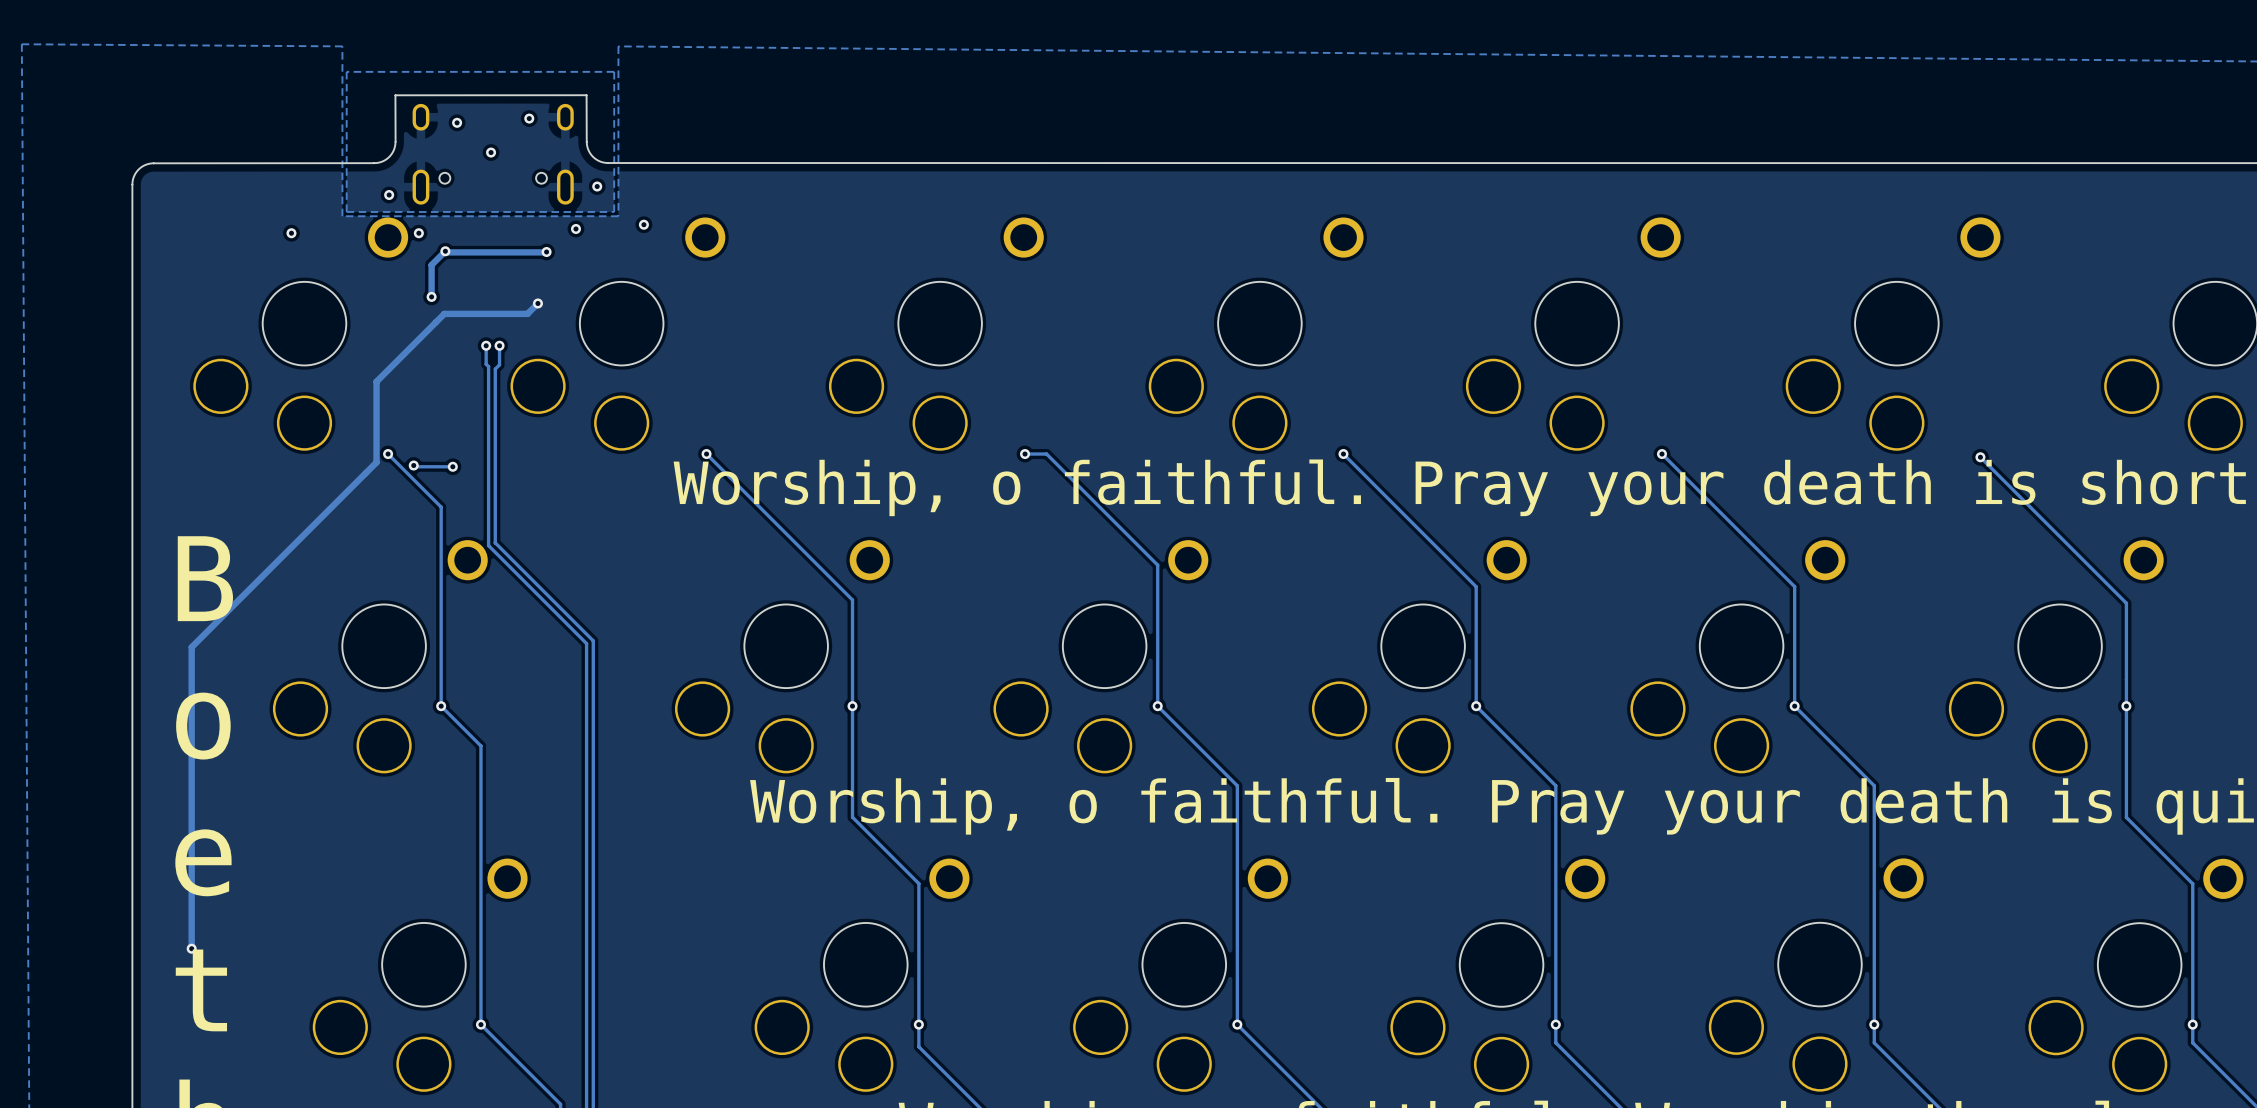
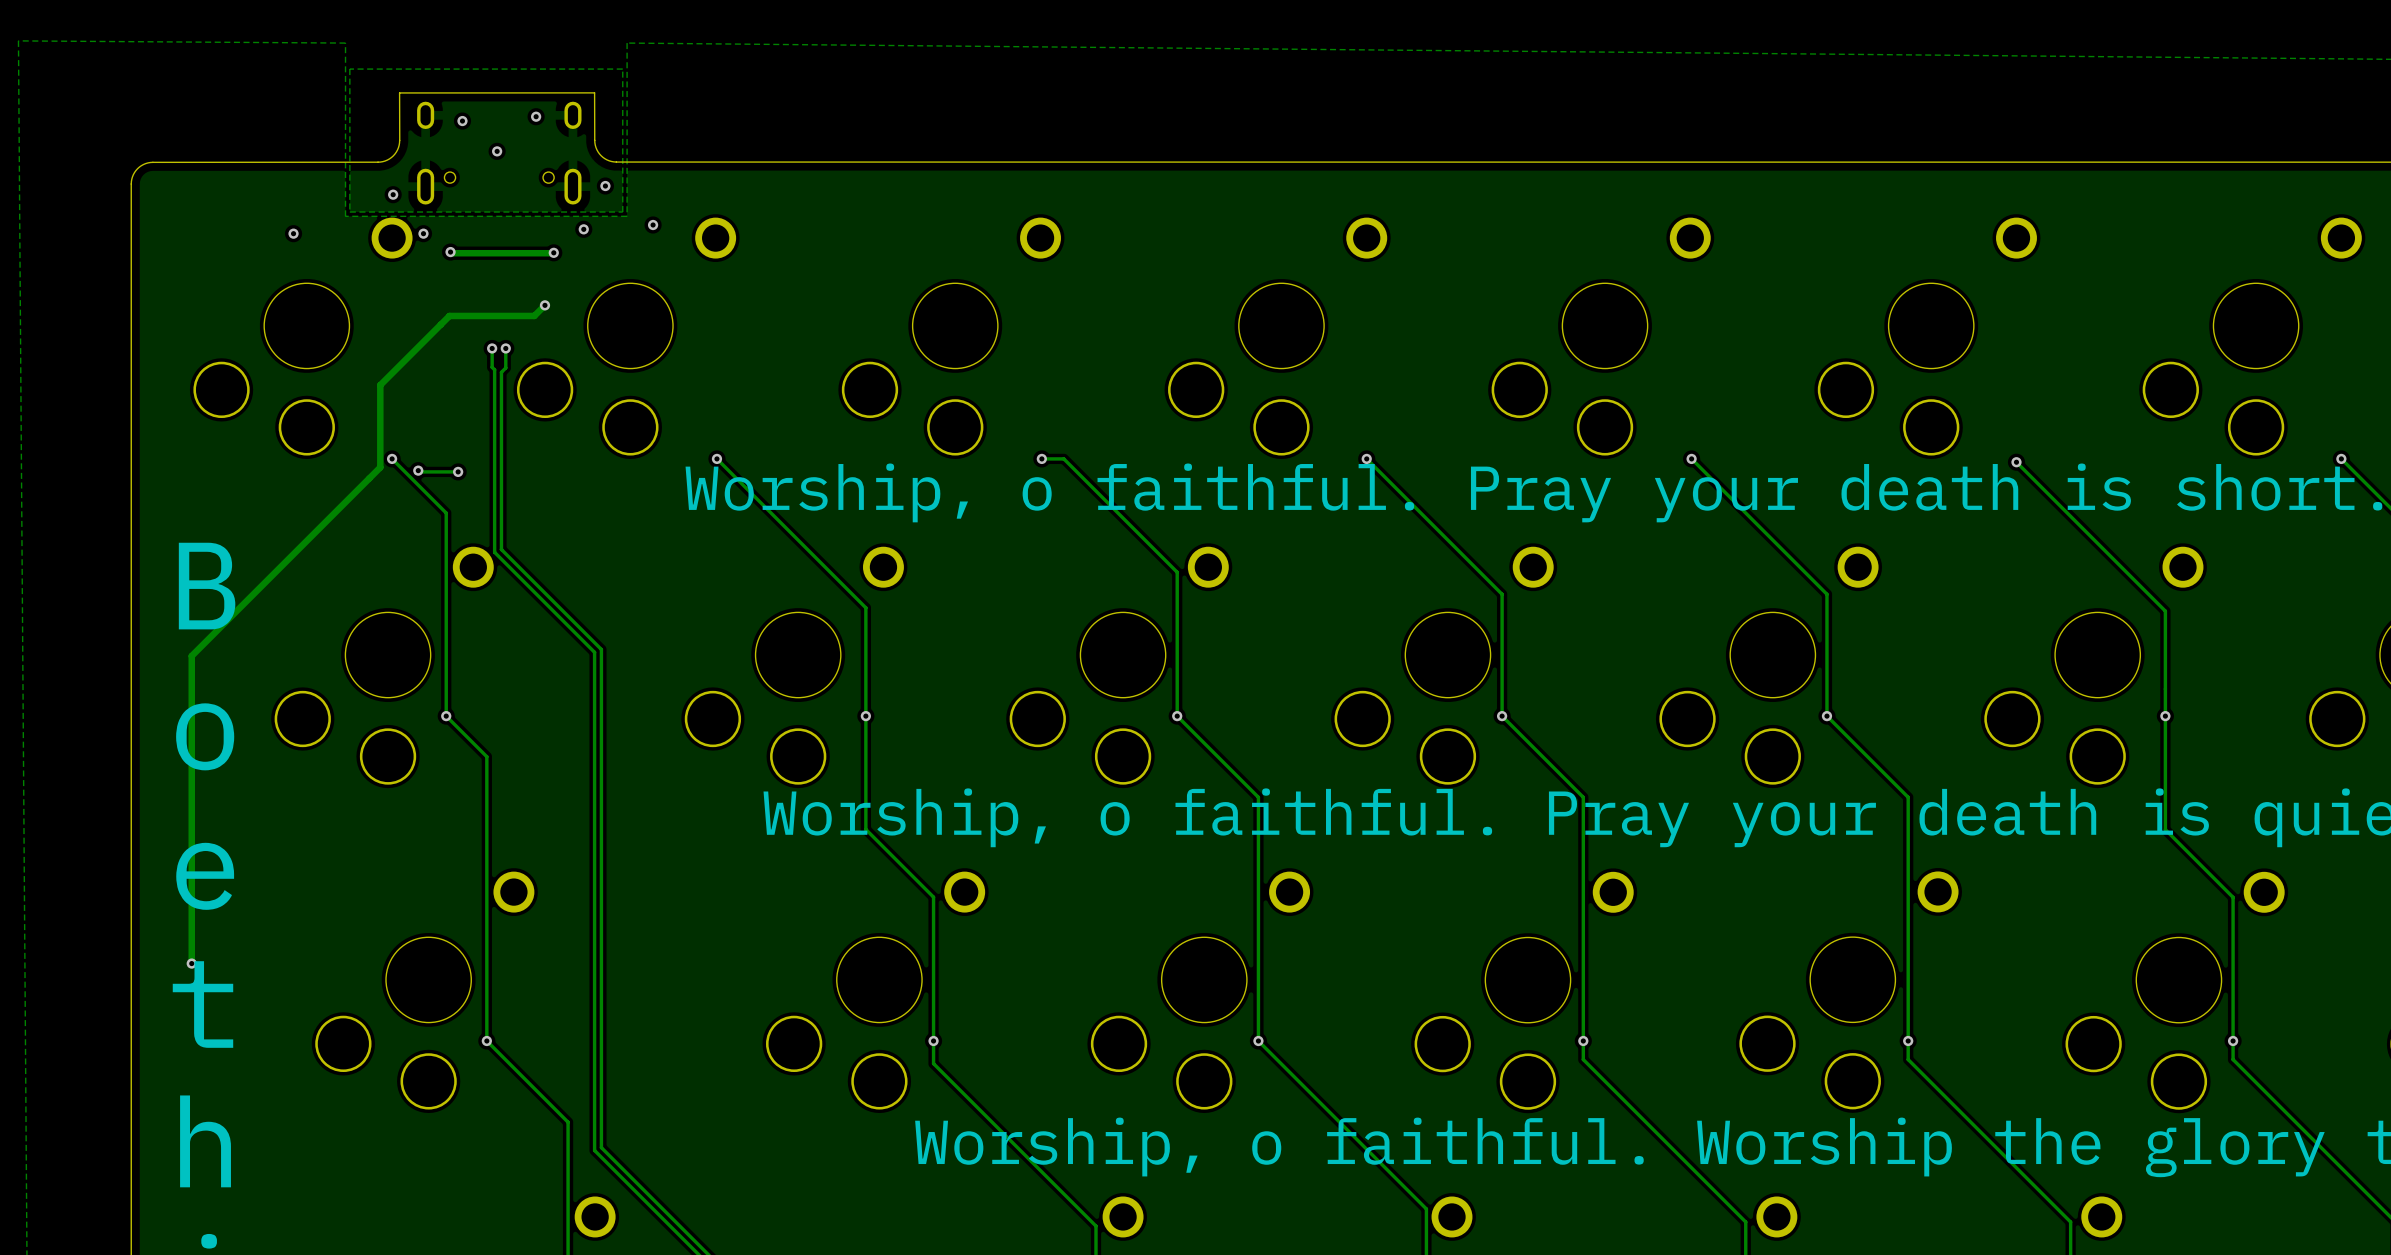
track: (445, 251) (431, 265) (431, 296) -> none
via: (431, 296) -> none

